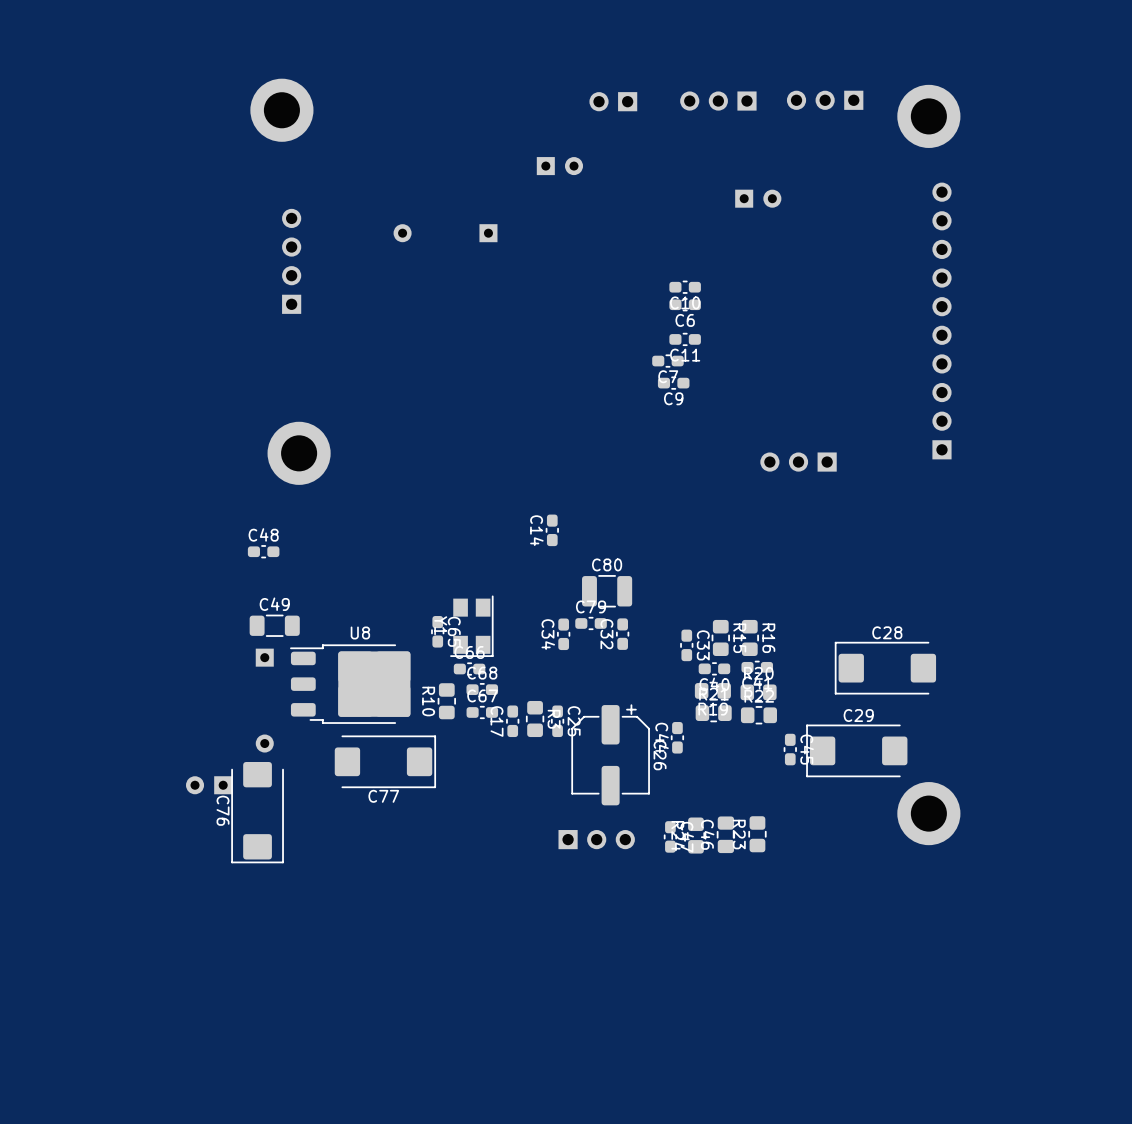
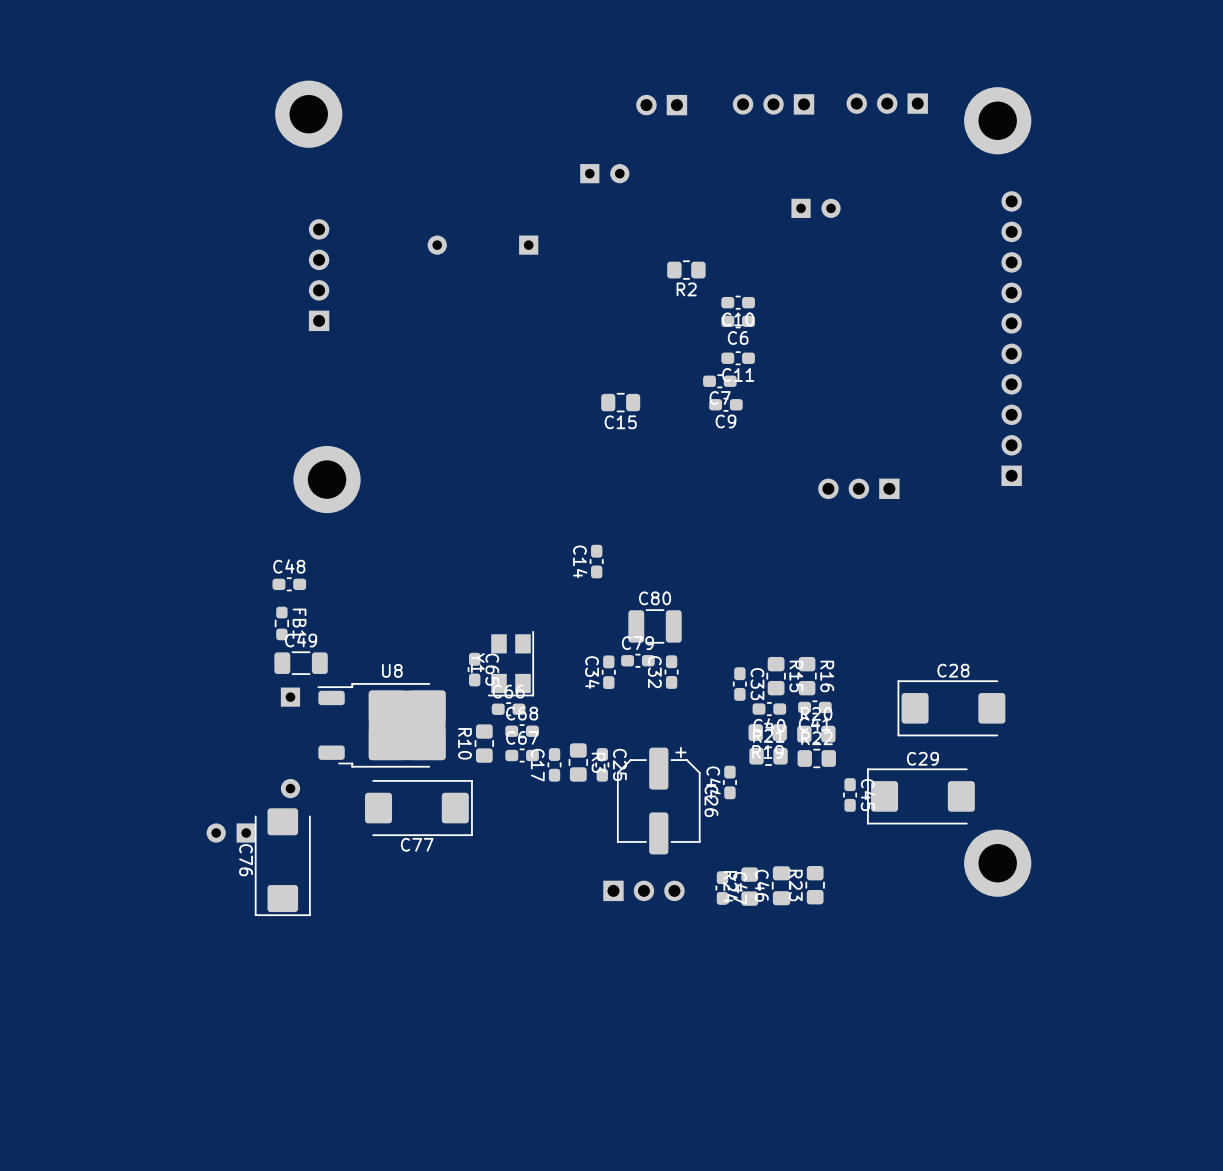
R2: none -> (686, 270)
C15: none -> (620, 402)
FB1: none -> (281, 623)
U8 footprint: [290, 644, 411, 724] -> [317, 683, 446, 768]

